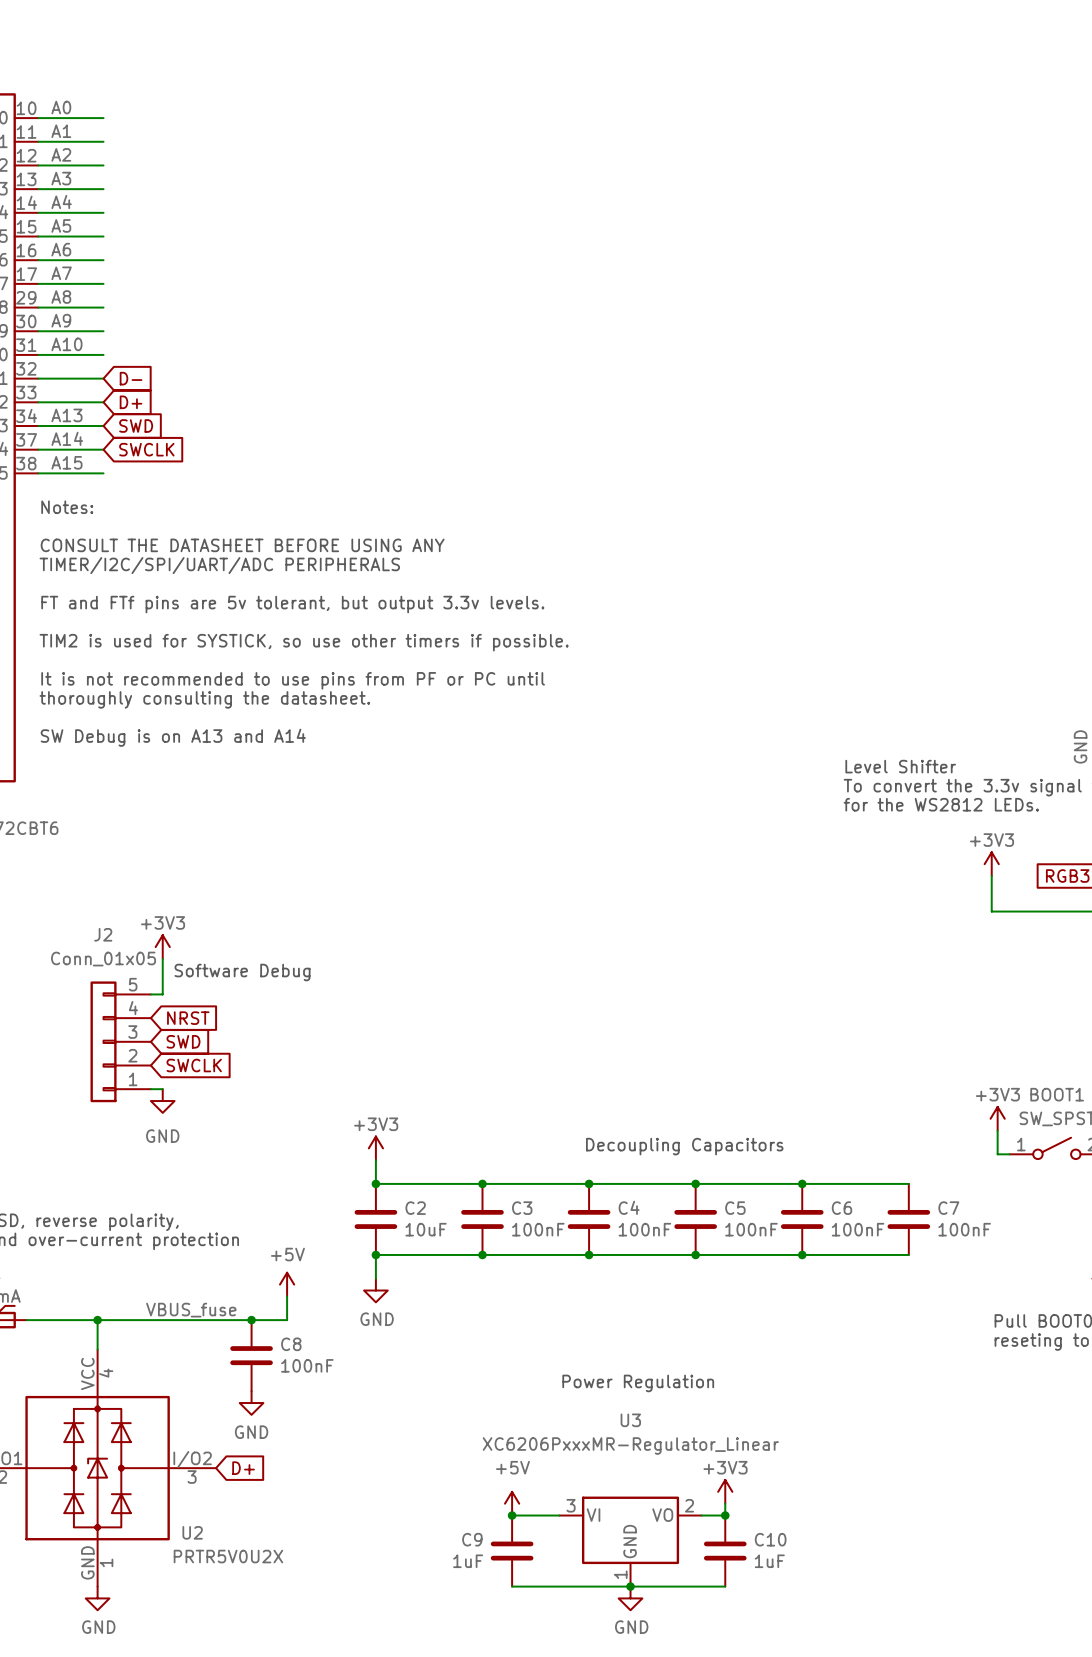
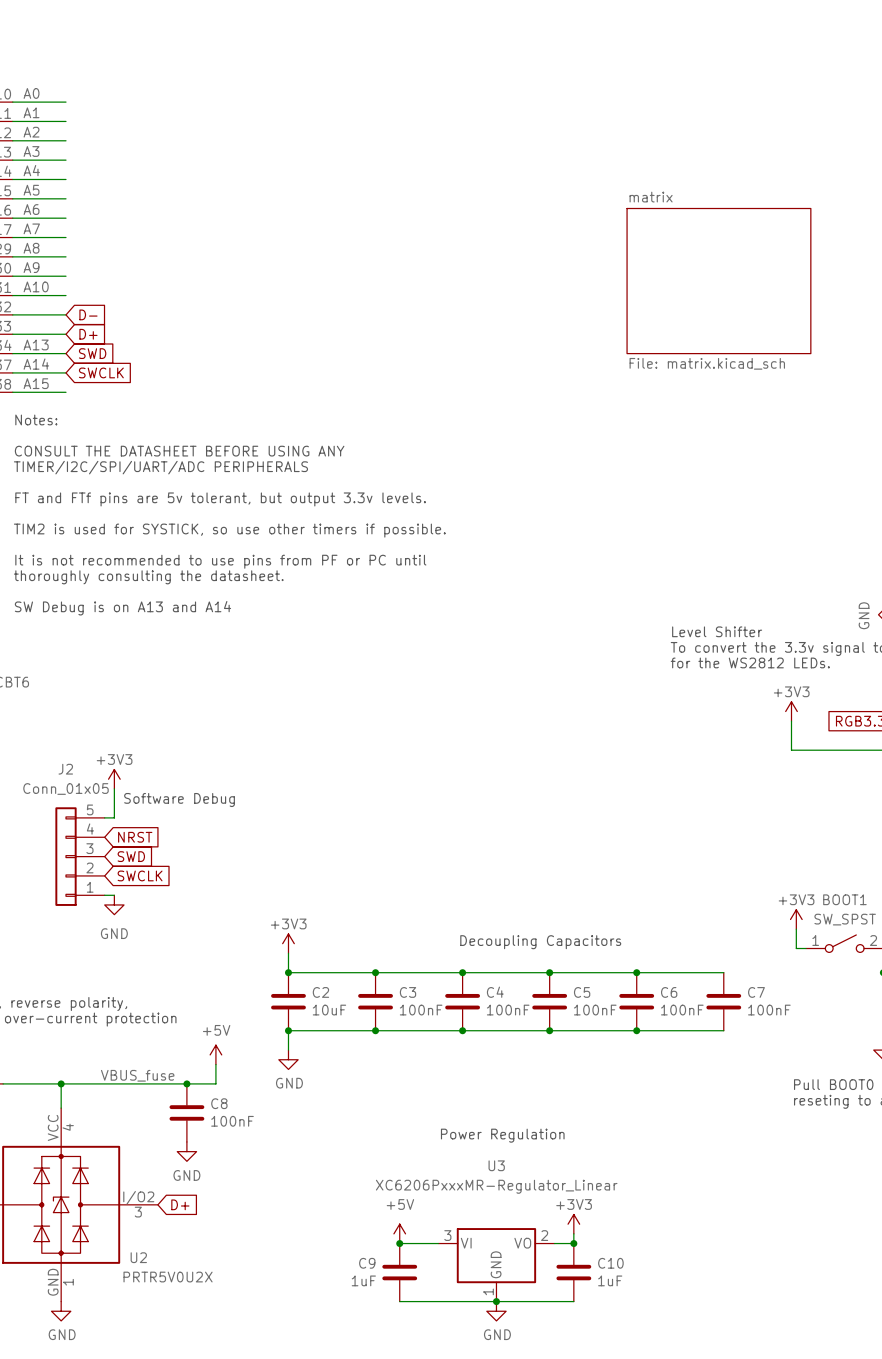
sheet matrix: none -> File: matrix.kicad_sch (718, 281)

